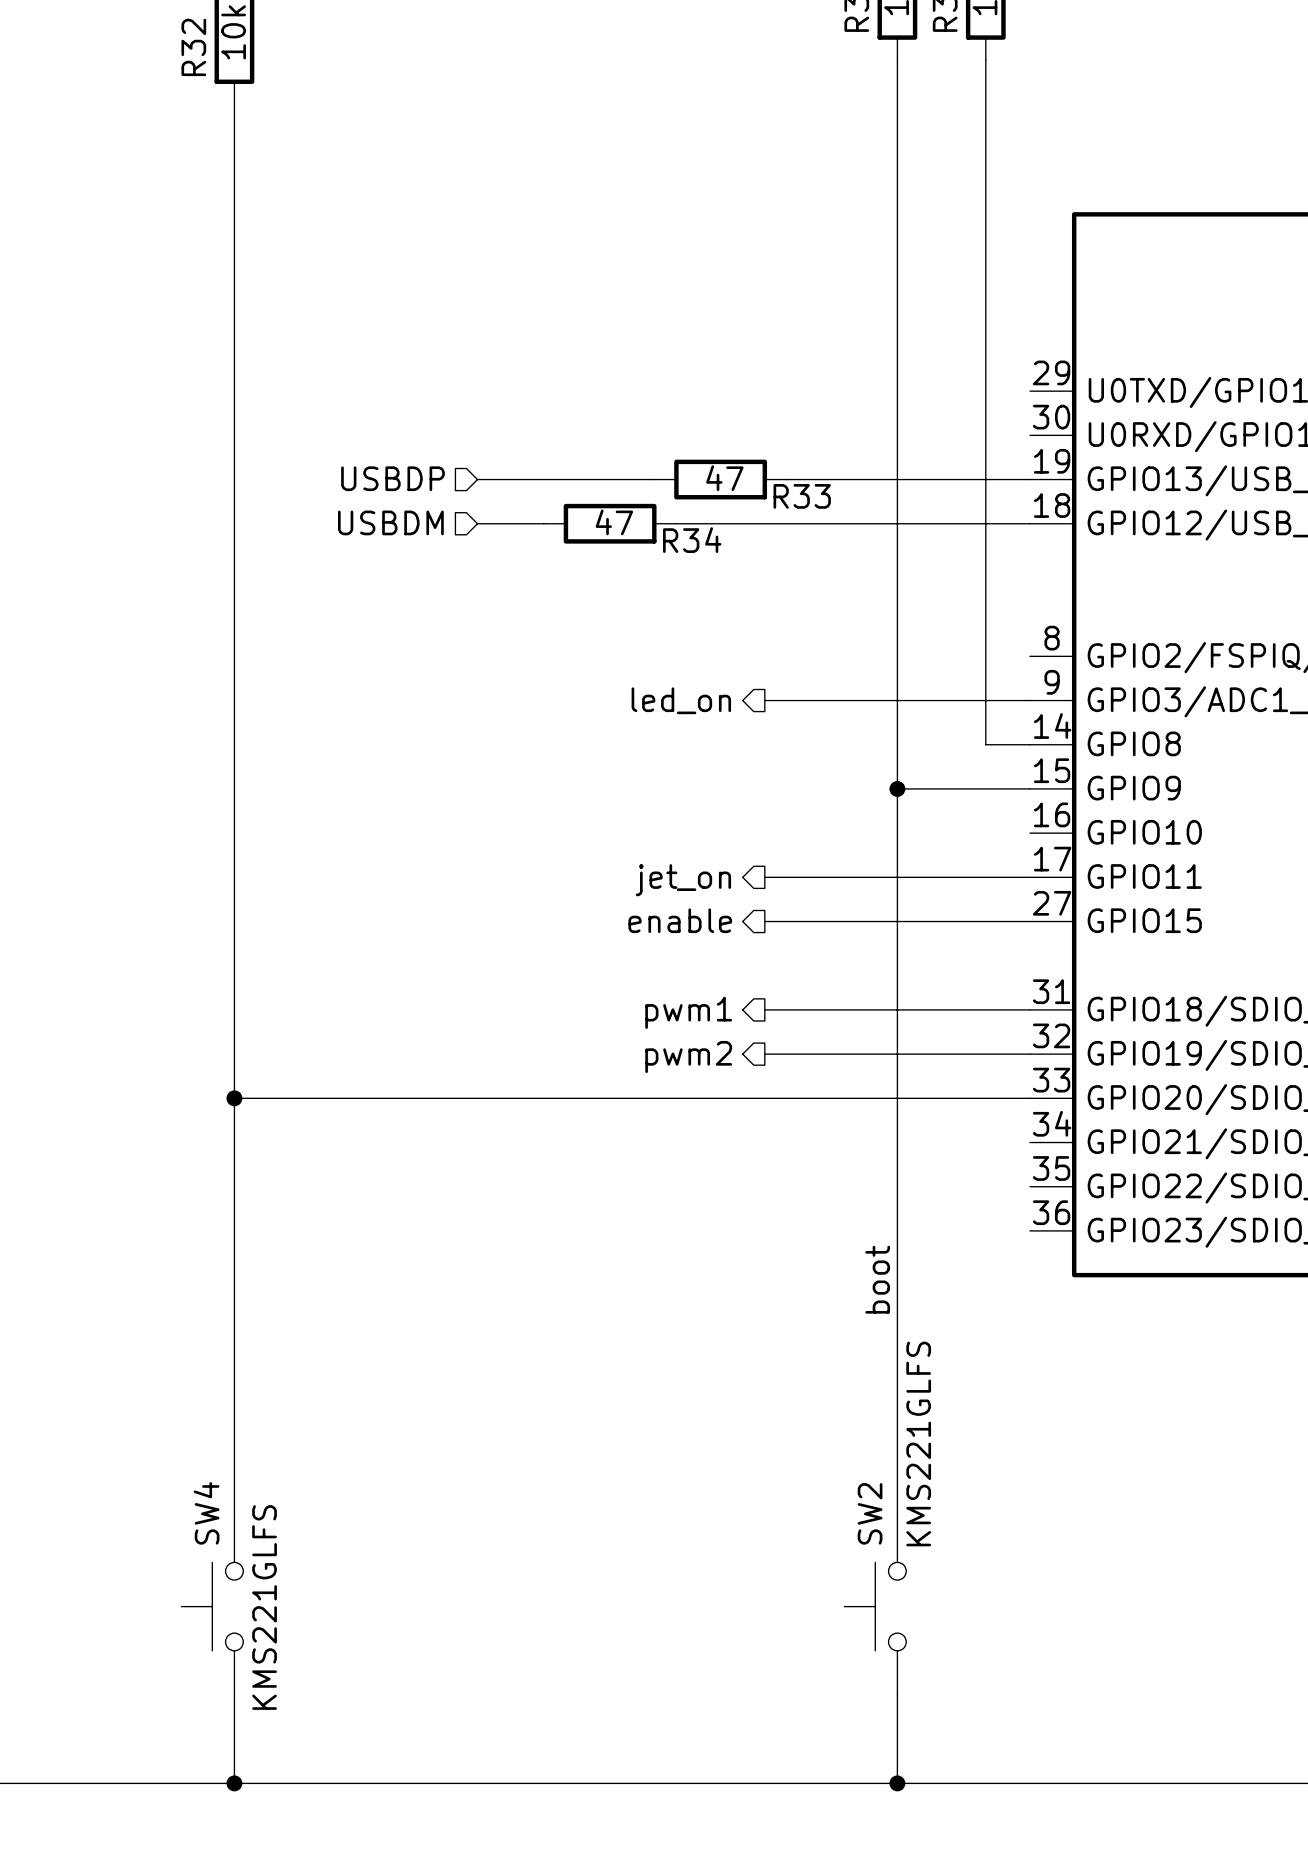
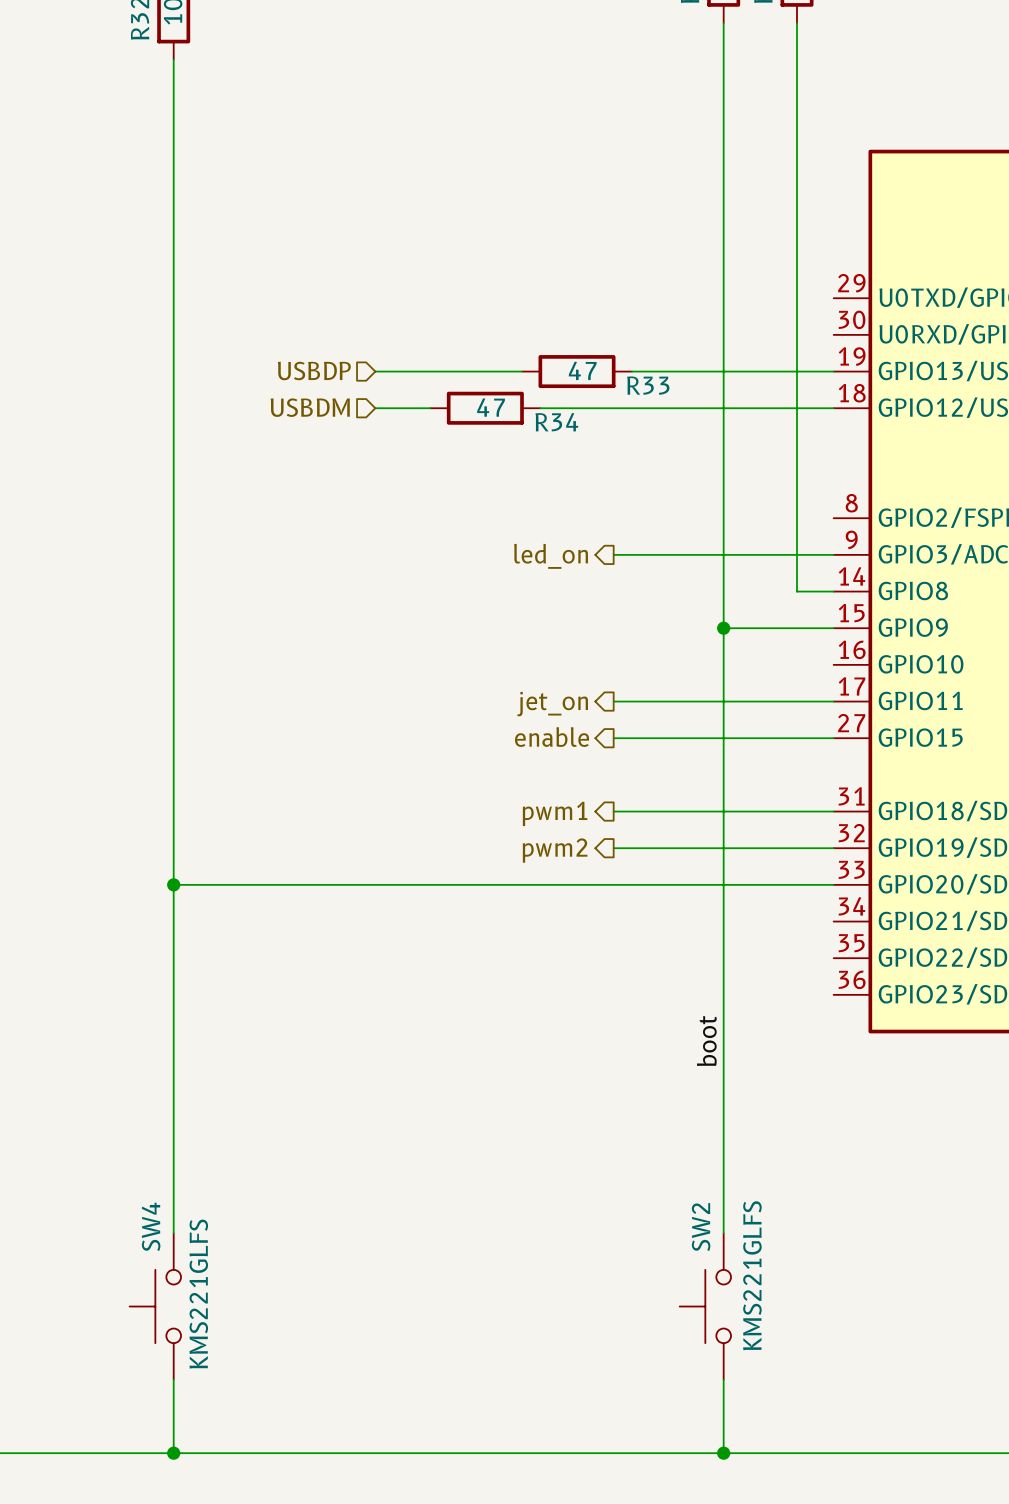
SW2 value position: KMS221GLFS (918, 1443) -> KMS221GLFS (752, 1275)

